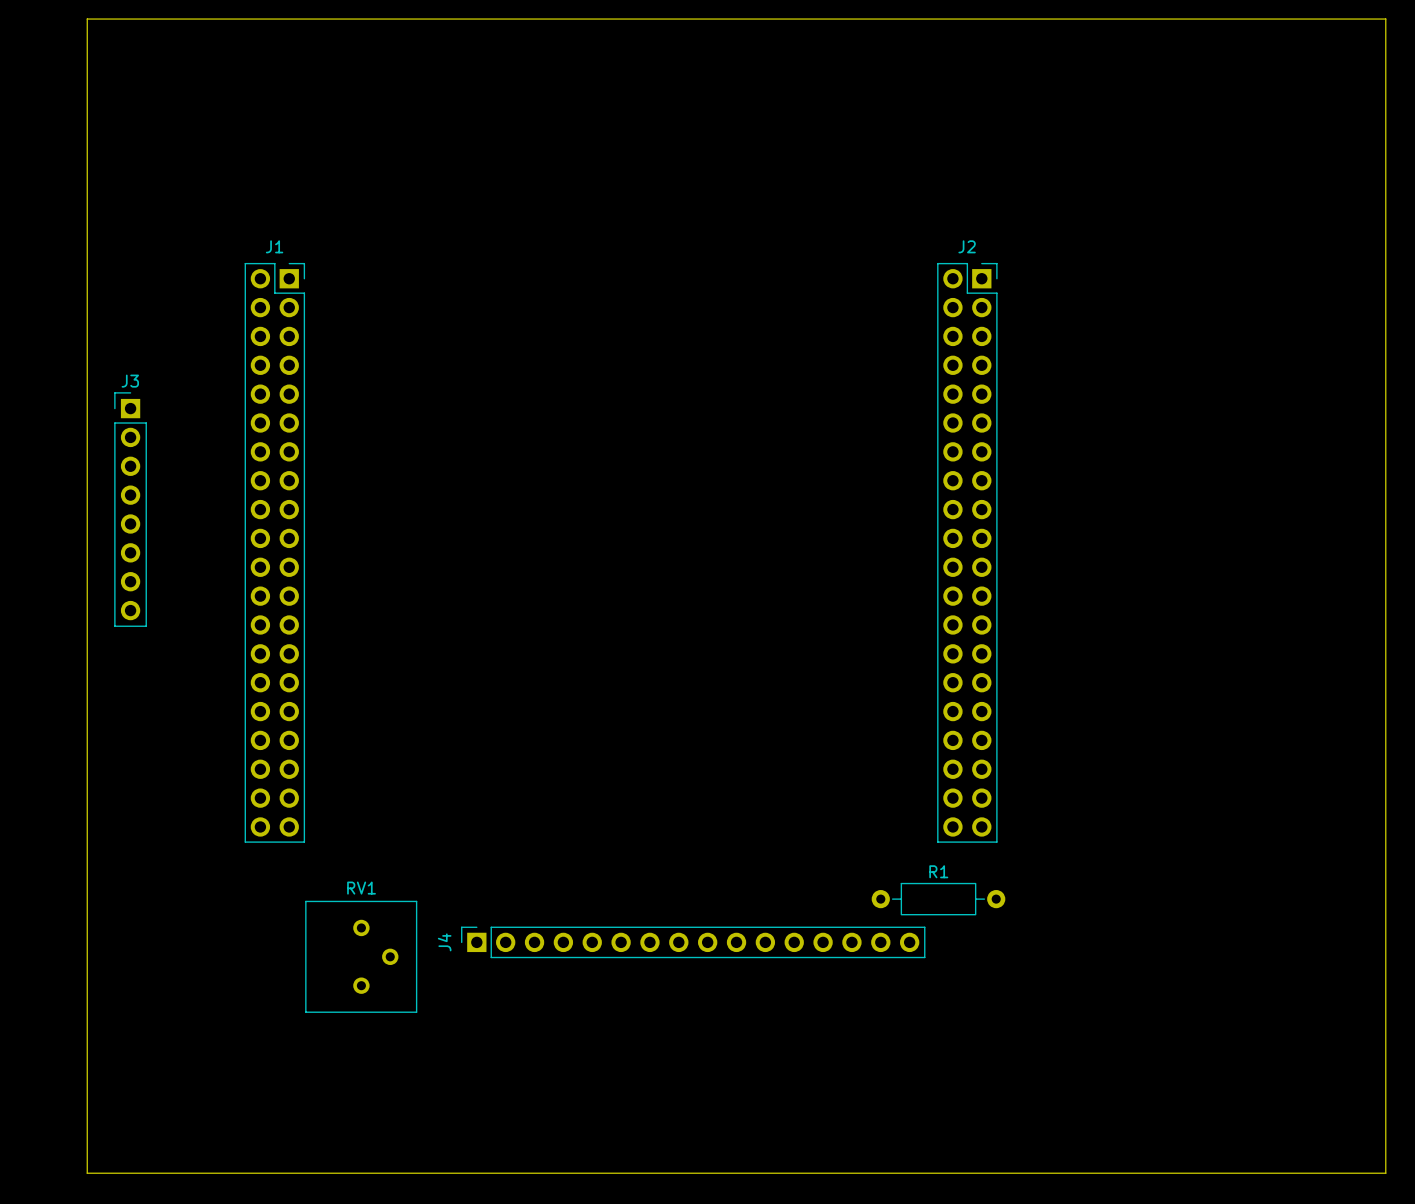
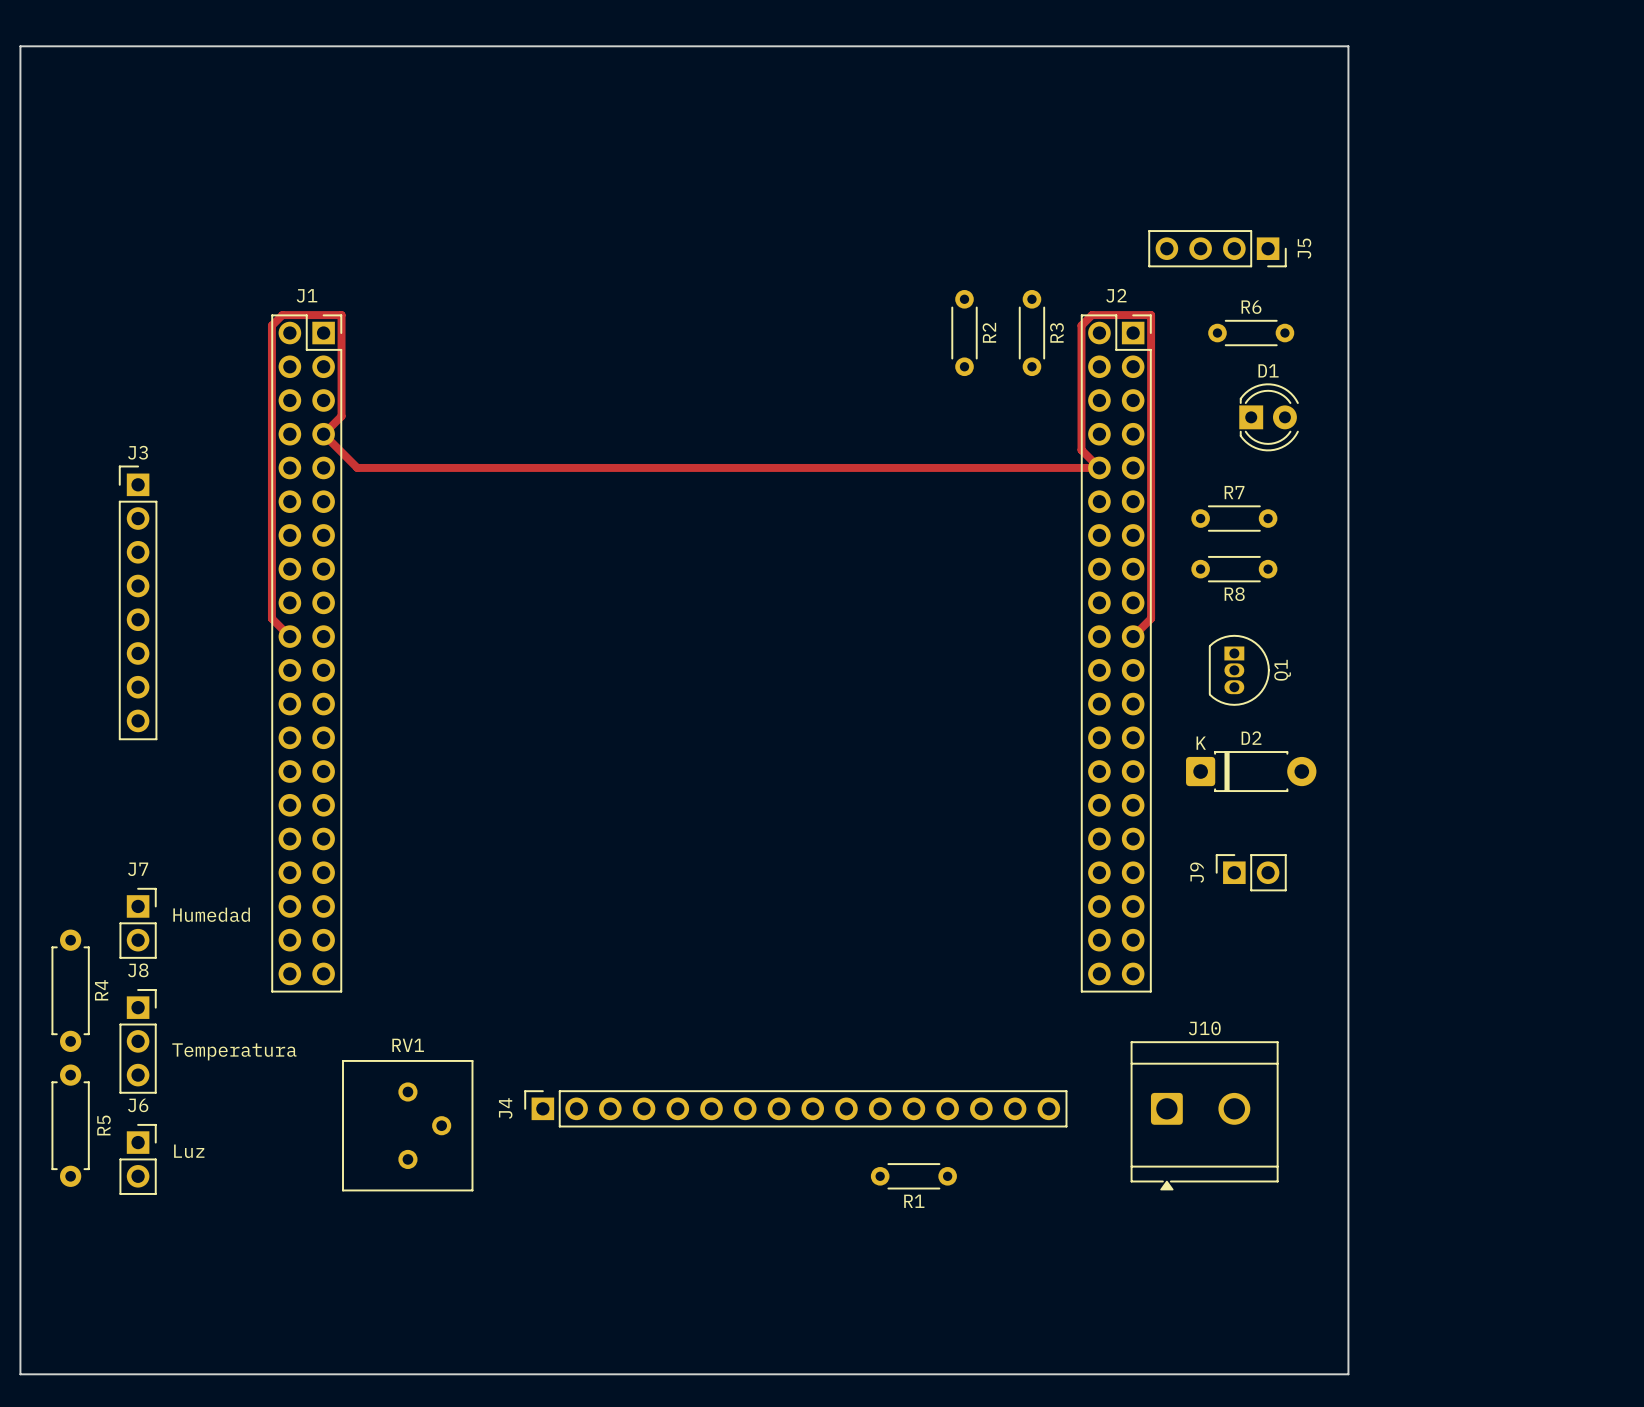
board edge: (87, 19) (1385, 19) (1385, 1173) (87, 1173) (87, 19) -> (20, 46) (20, 1374) (1348, 1374) (1348, 46) (20, 46)
J5: none -> (1217, 248)
R2: none -> (964, 333)
R3: none -> (1031, 333)
R6: none -> (1251, 333)
D1: none -> (1268, 417)
R7: none -> (1234, 518)
R8: none -> (1234, 569)
track: none -> (289, 636) (271, 618) (271, 325) (282, 315) (341, 315) (341, 416) (323, 434) (357, 467) (1099, 467) (1081, 450) (1081, 325) (1092, 315) (1151, 315) (1151, 618) (1133, 636)
Q1: none -> (1239, 670)
D2: none -> (1251, 771)
J9: none -> (1251, 872)
text: none -> Humedad (211, 914)
J7: none -> (138, 923)
R4: none -> (70, 990)
R1 name position: R1 (938, 871) -> R1 (914, 1201)
R1 footprint: [871, 882, 1006, 916] -> [870, 1163, 957, 1190]
J8: none -> (138, 1041)
text: none -> Temperatura (234, 1051)
J10: none -> (1204, 1115)
R5: none -> (70, 1125)
text: none -> Luz (189, 1151)
J6: none -> (138, 1159)

